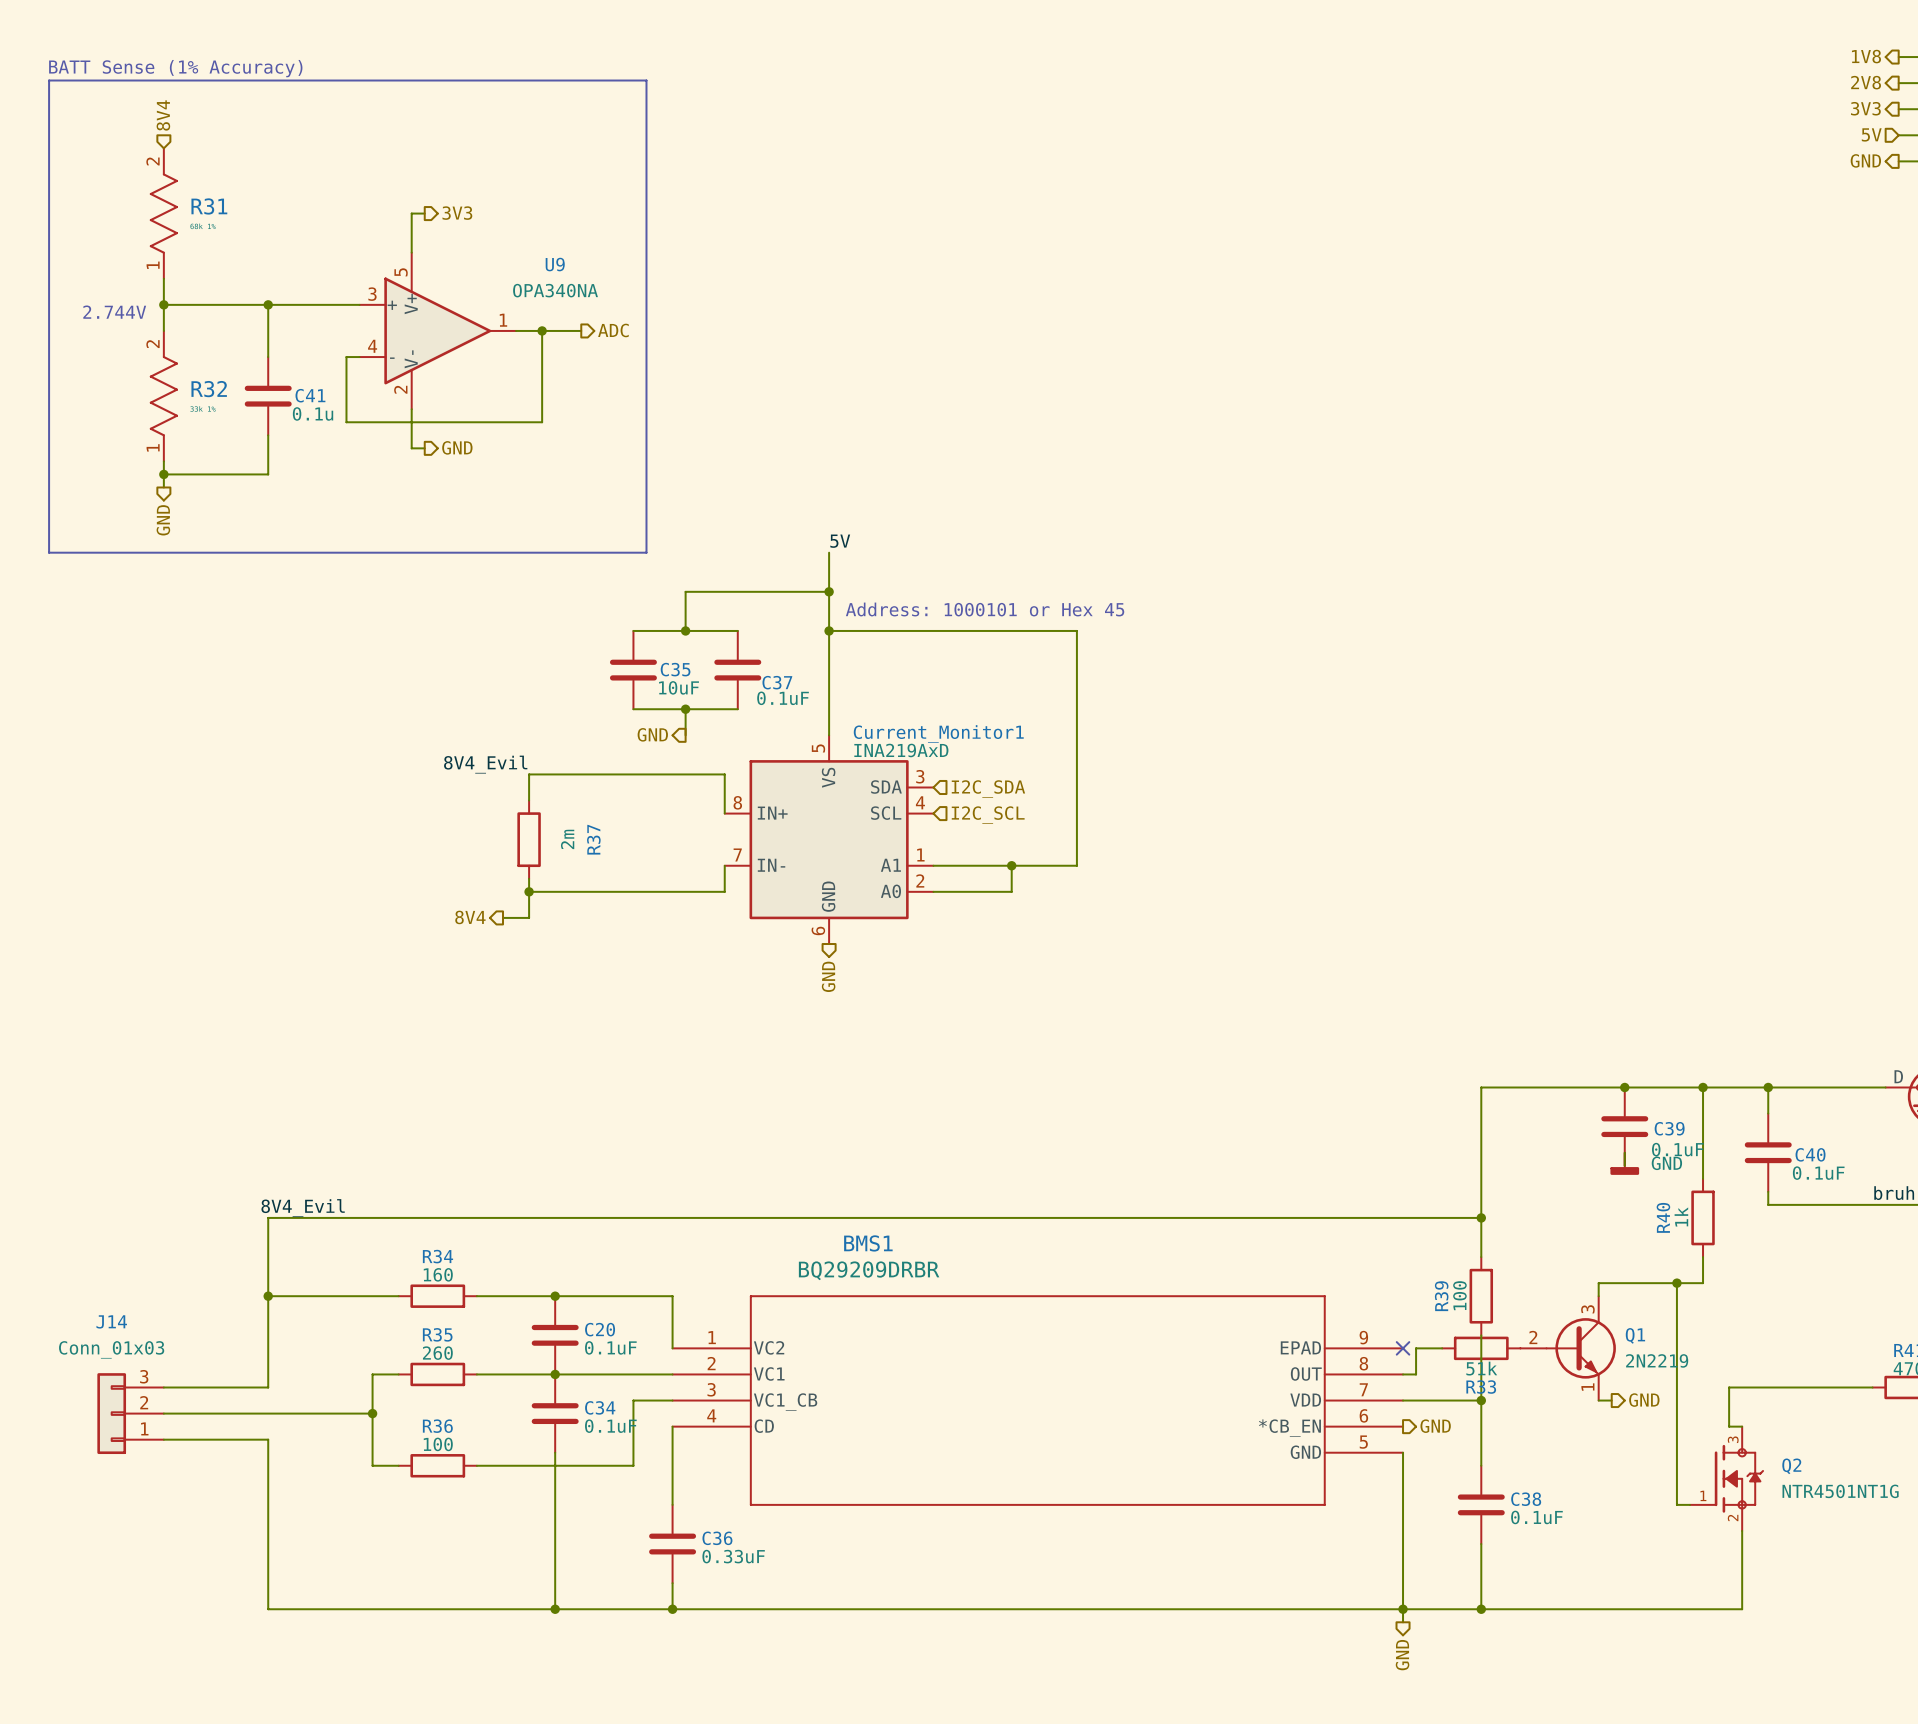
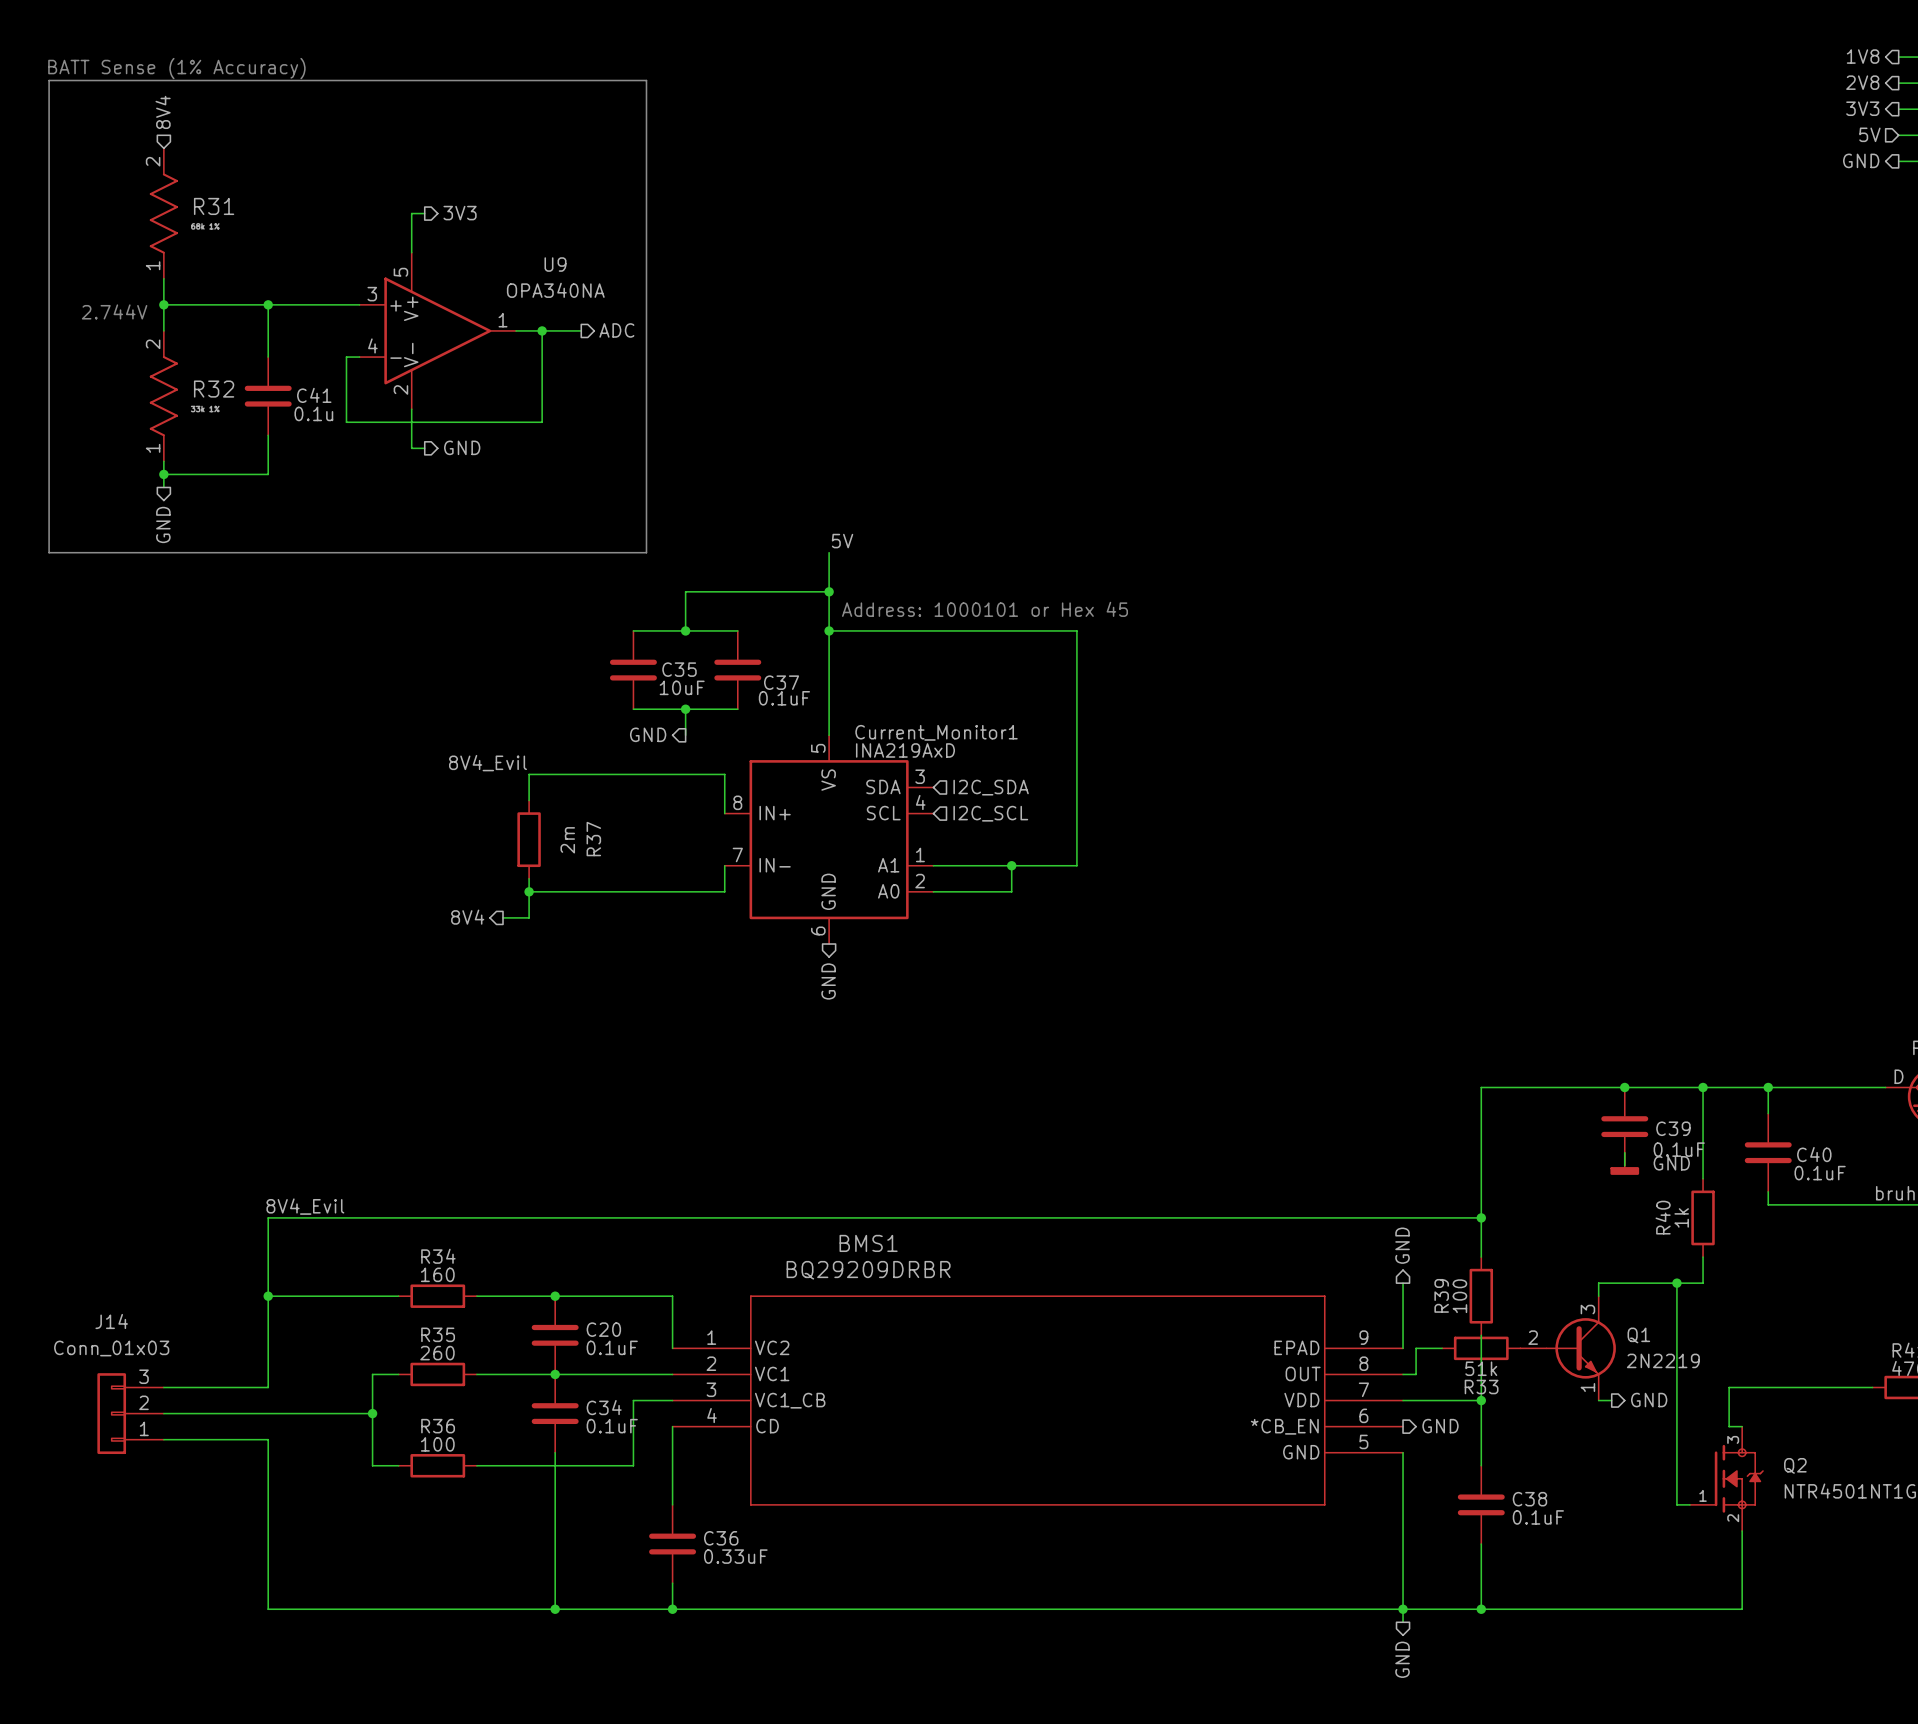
hierarchical label: none -> GND (1402, 1245)
wire: none -> (1403, 1283) (1403, 1348)
no-connect mark: (1403, 1348) -> none

